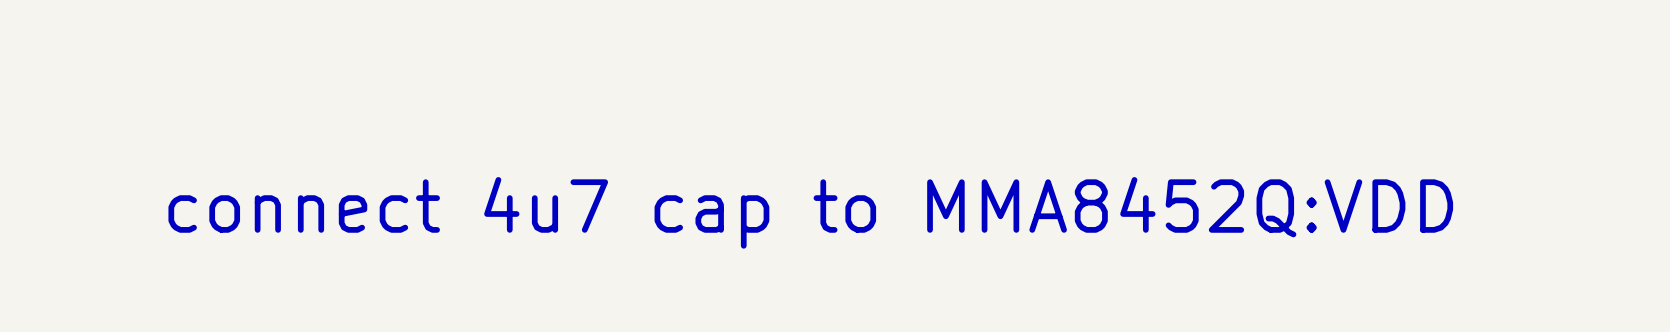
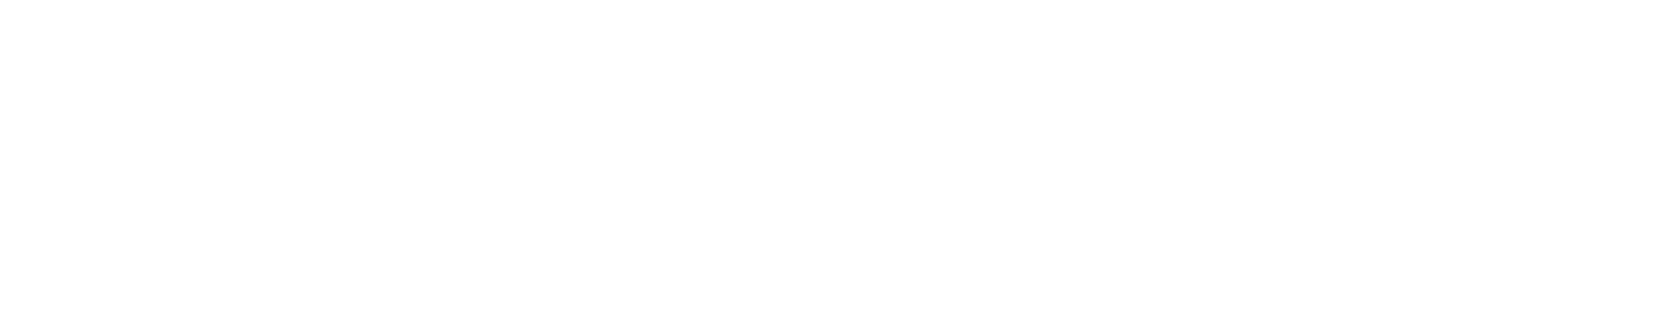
text: connect 4u7 cap to MMA8452Q:VDD (810, 212) -> none

